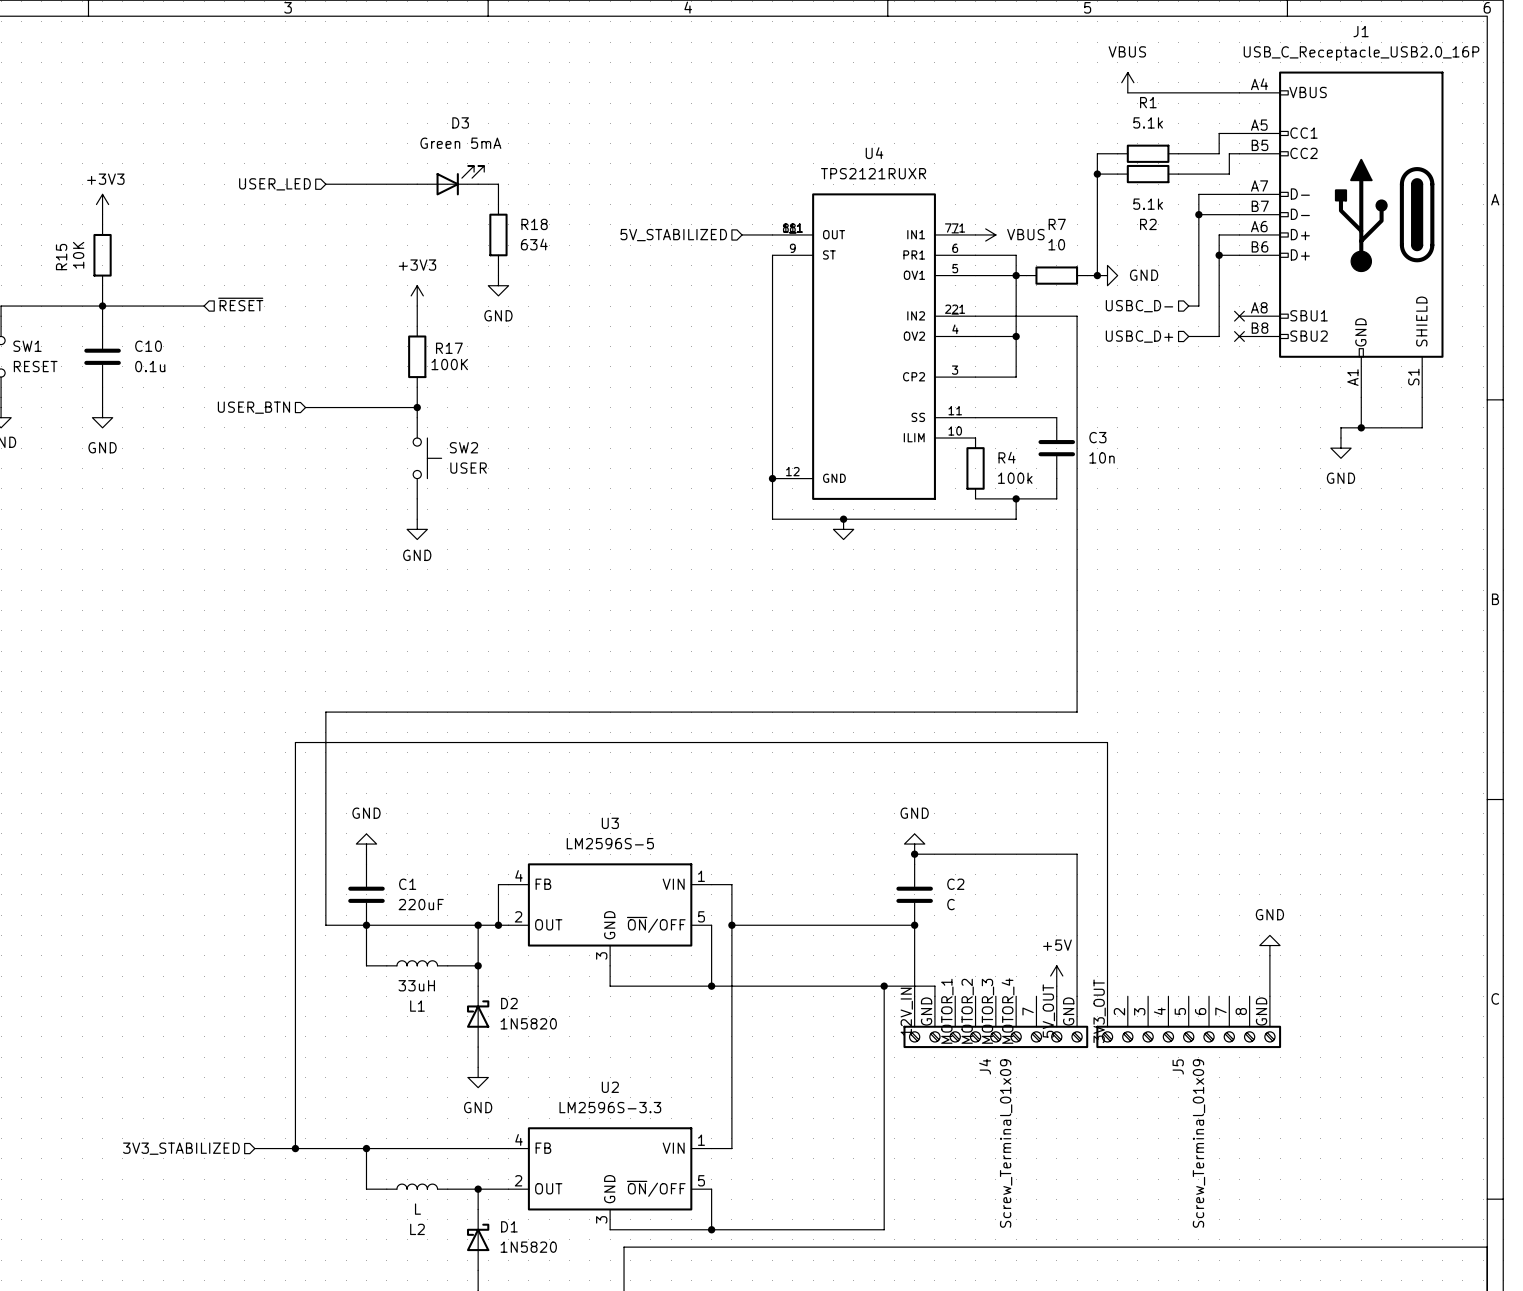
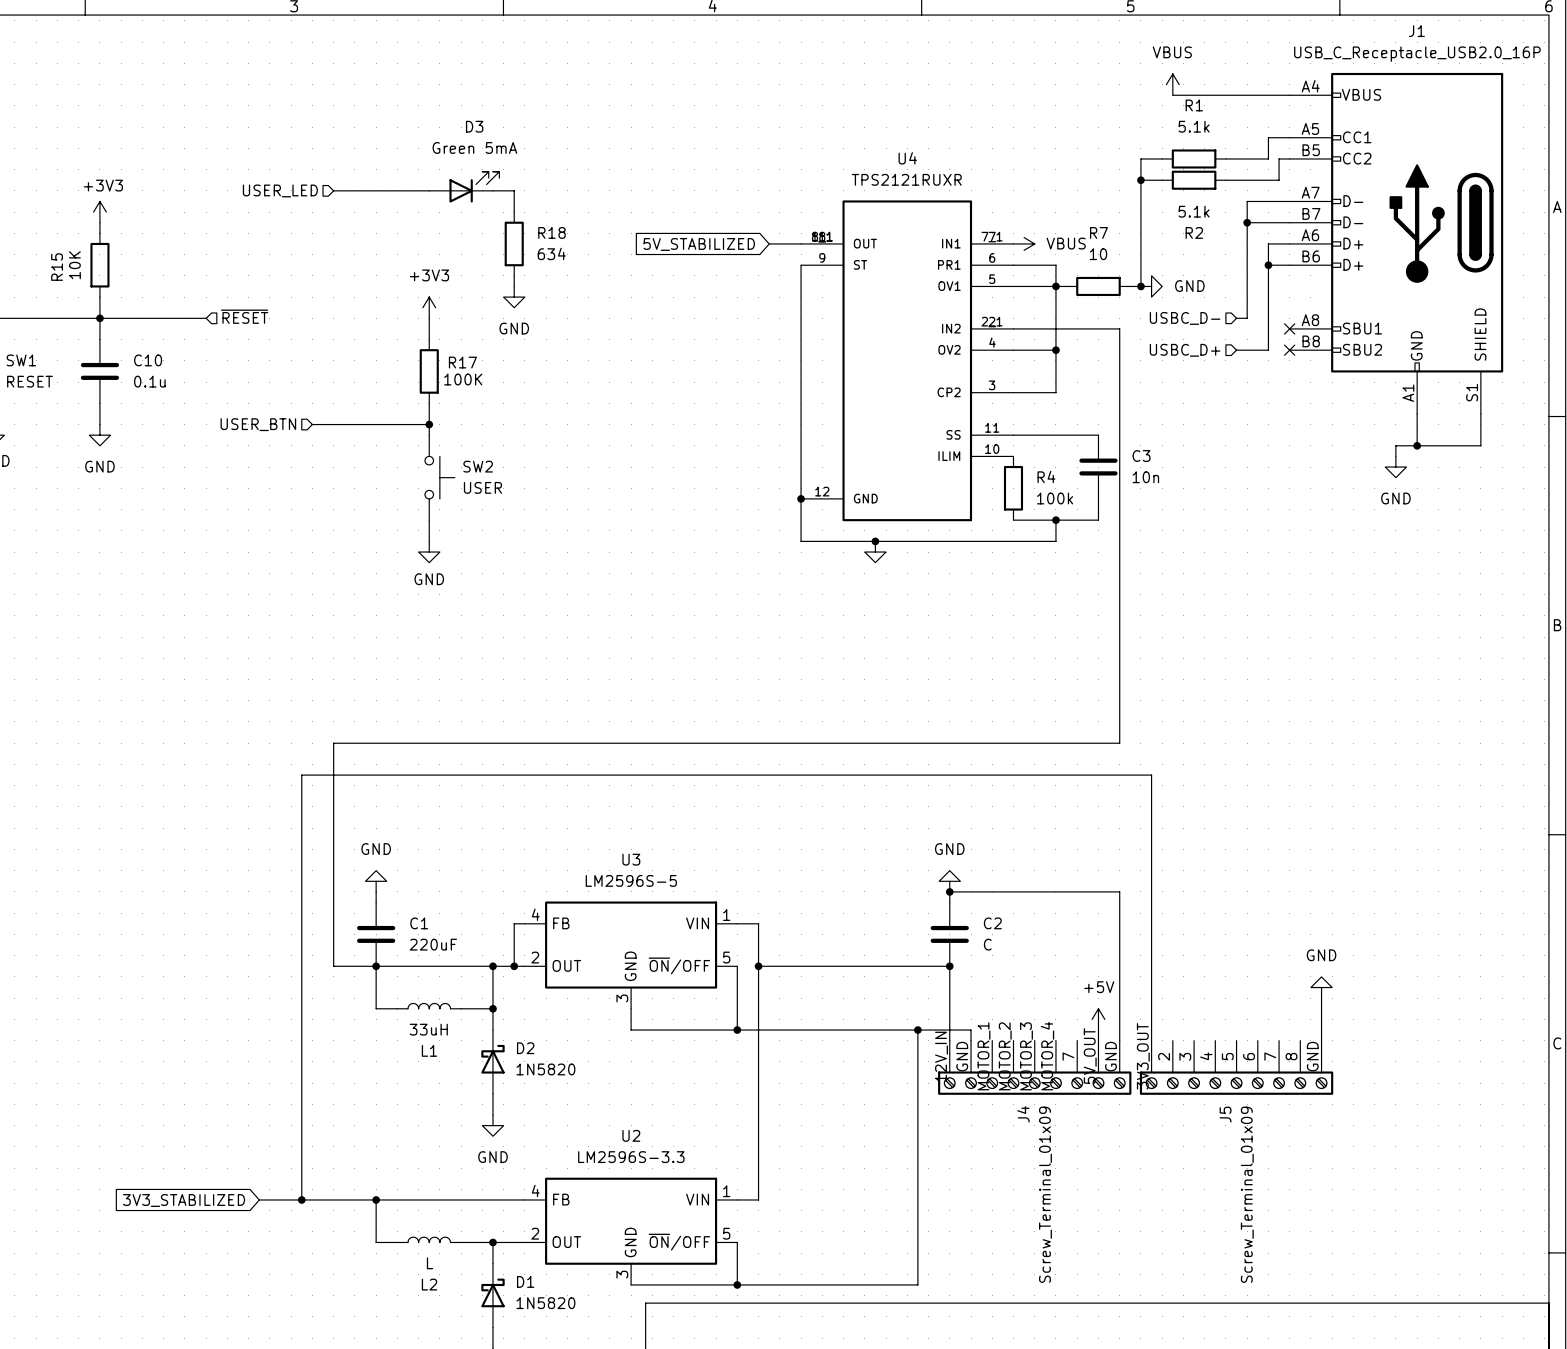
hierarchical label: 5V_STABILIZED (673, 235) -> none
global label: none -> 5V_STABILIZED (699, 244)
hierarchical label: 3V3_STABILIZED (181, 1148) -> none
global label: none -> 3V3_STABILIZED (184, 1200)

